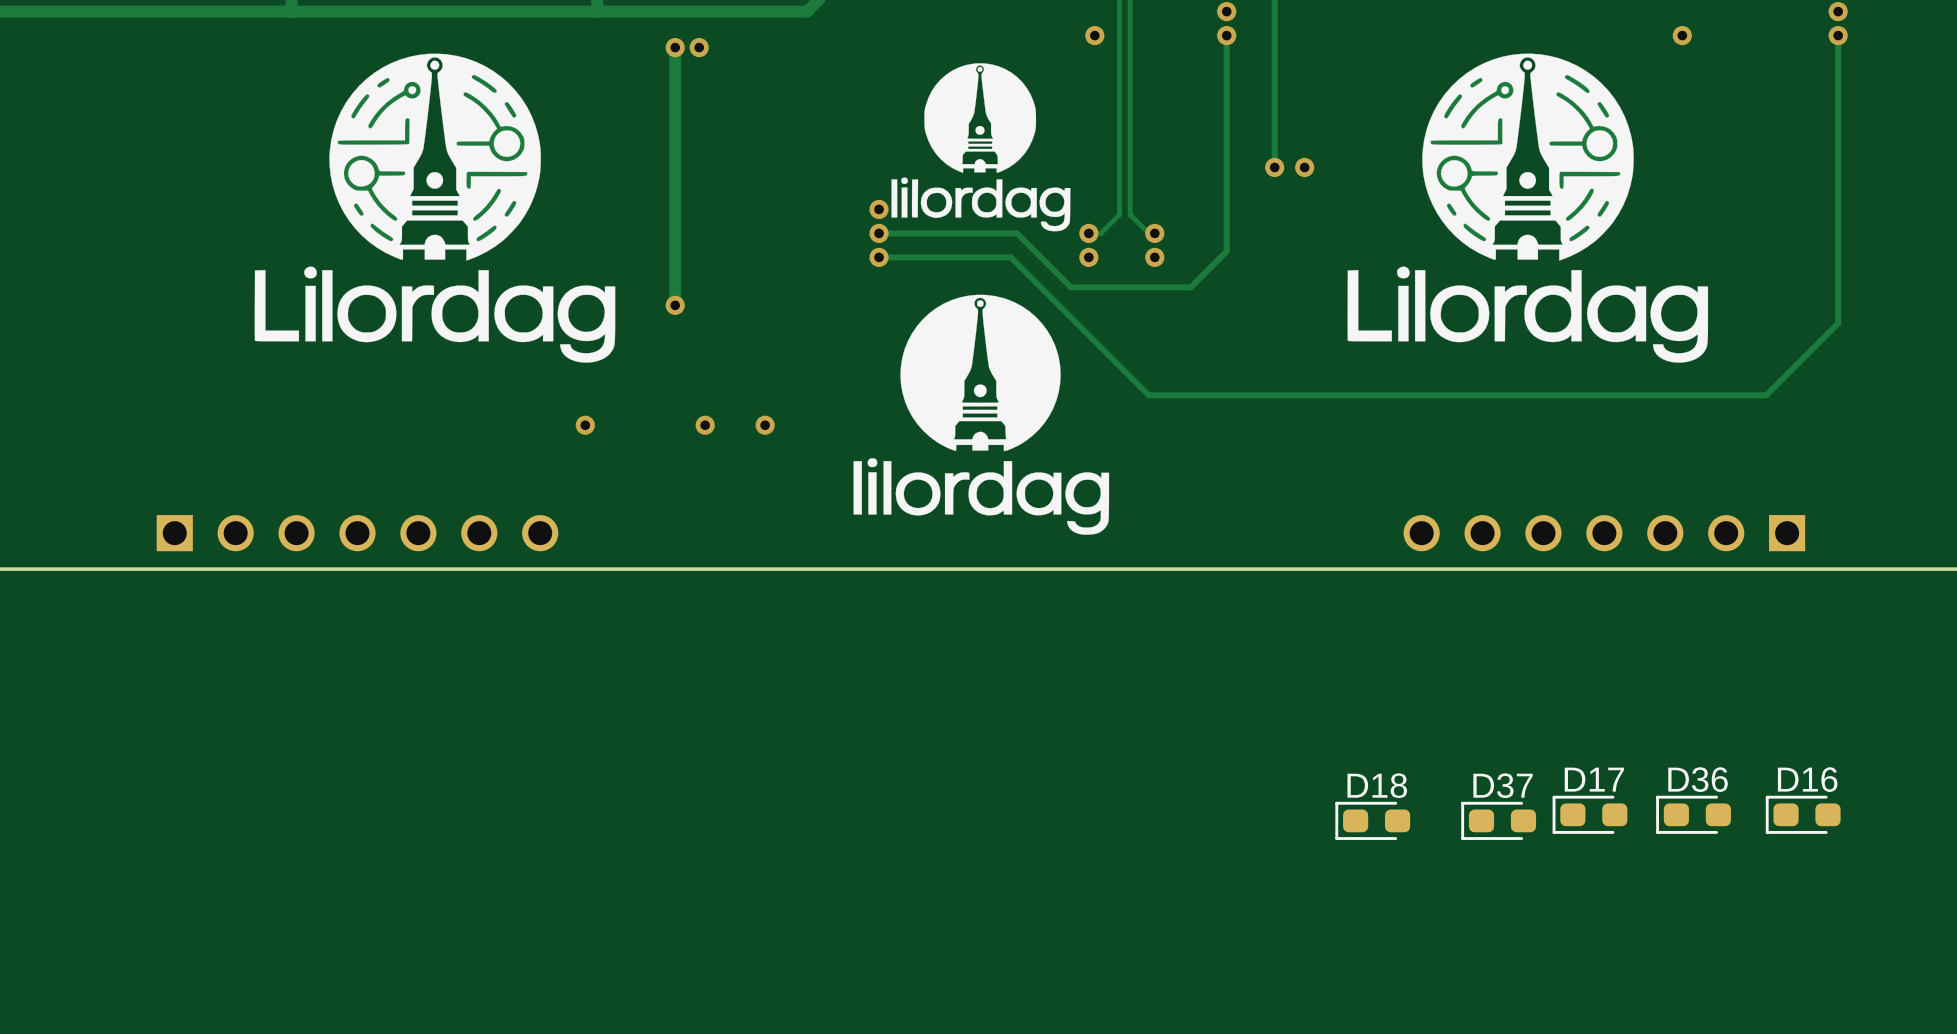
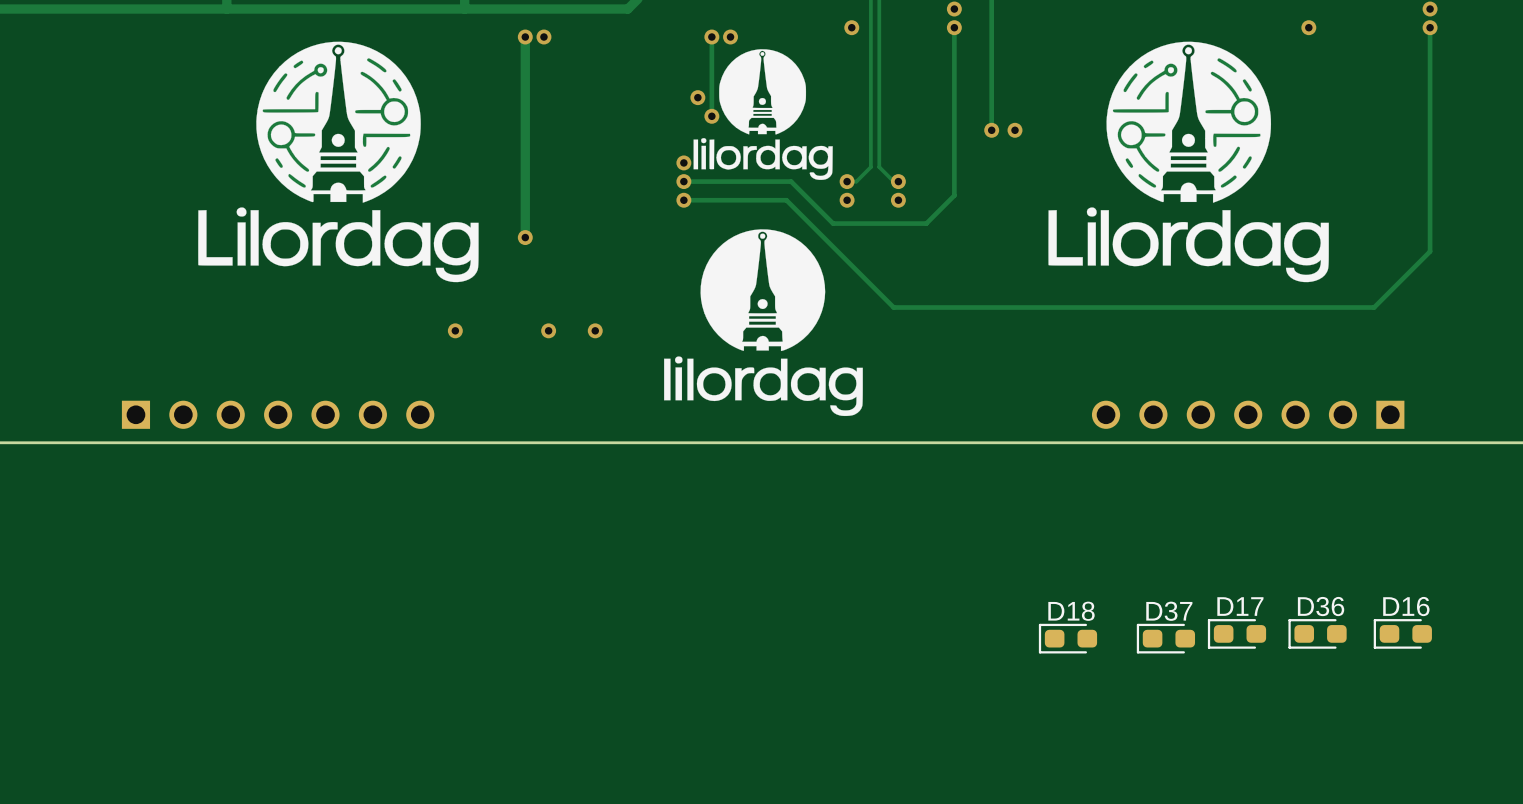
track: none -> (711, 37) (711, 116)
via: none -> (711, 37)
via: none -> (730, 37)
via: none -> (697, 97)
via: none -> (711, 116)

